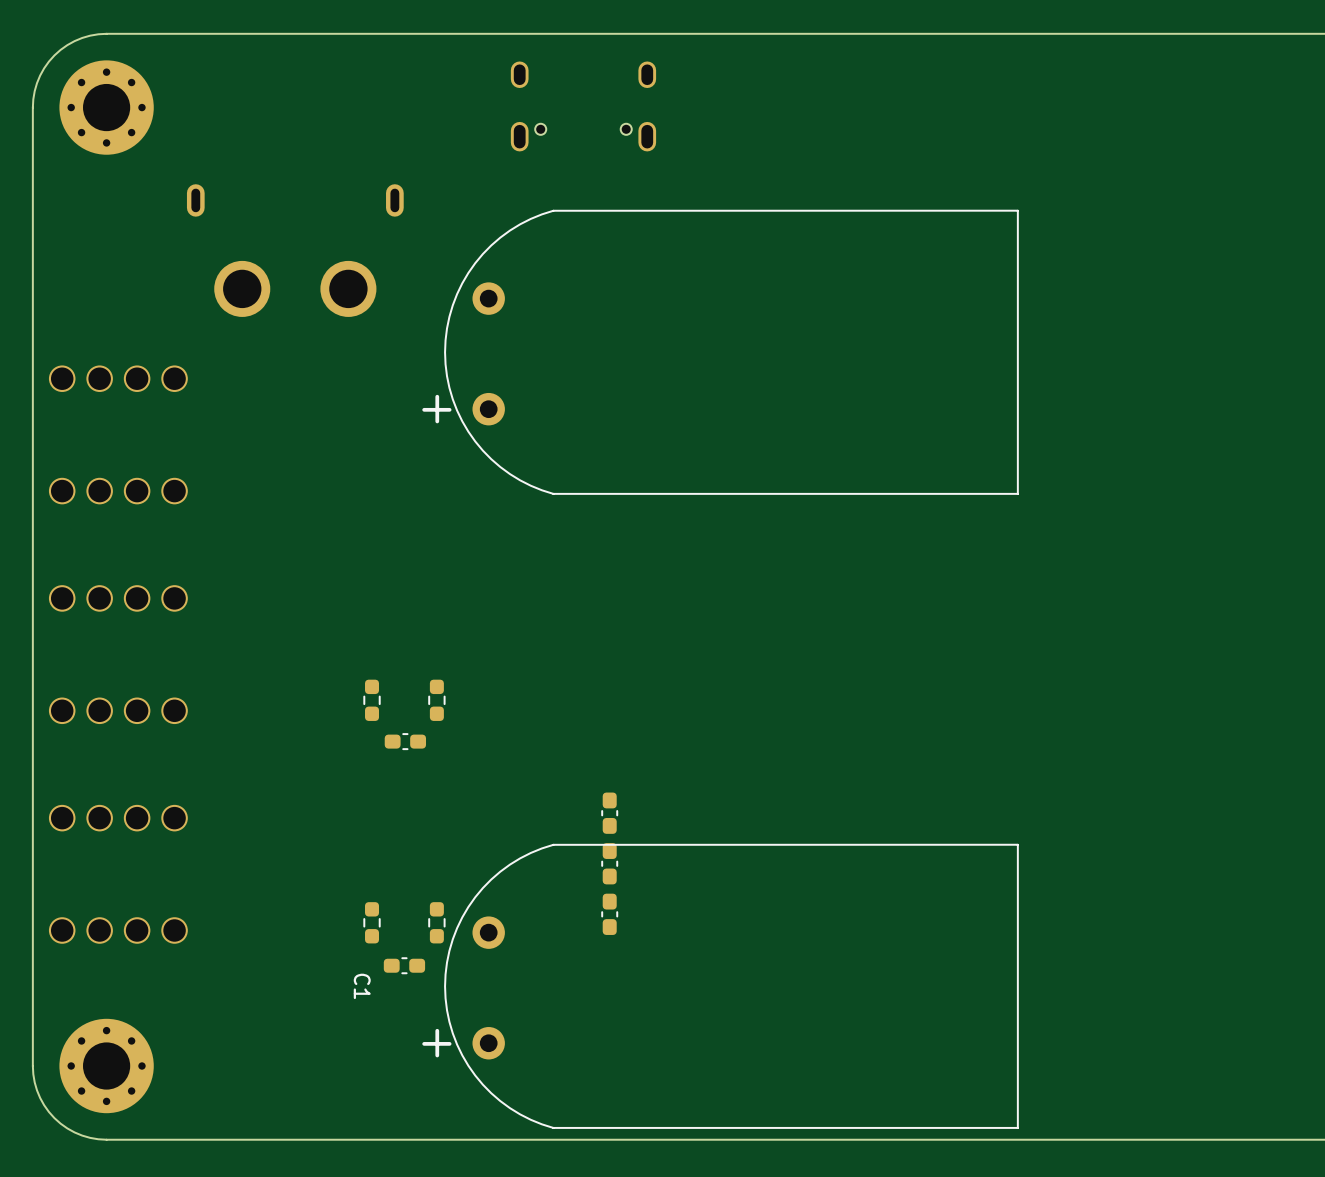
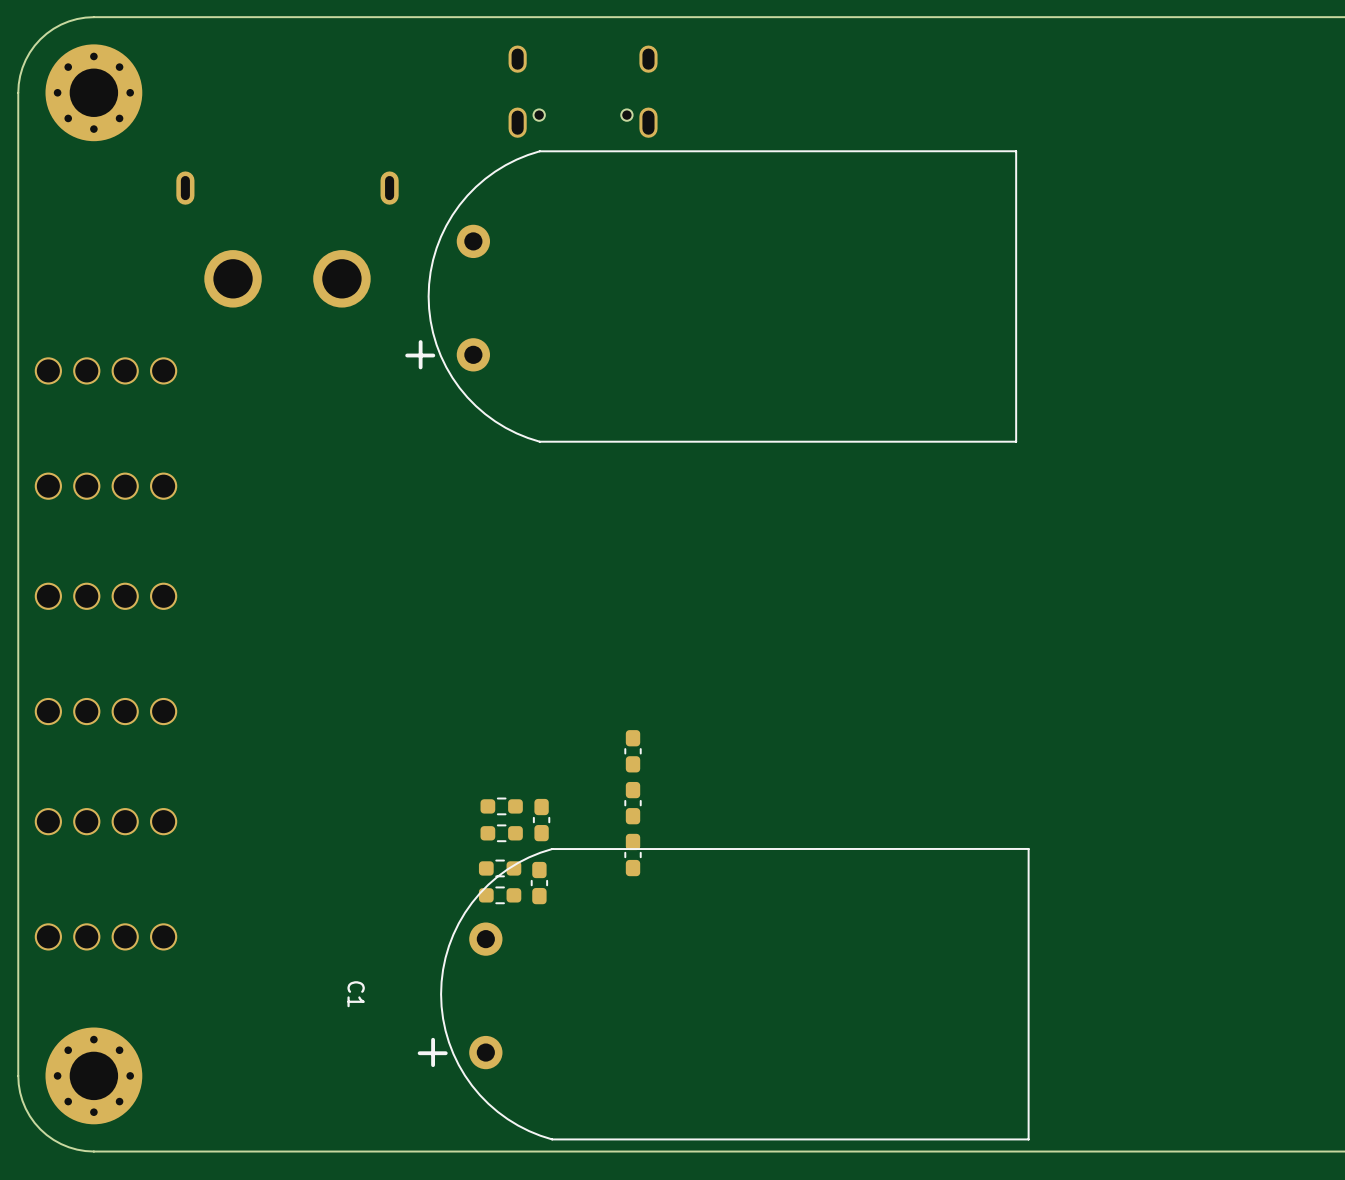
part position: (720, 352) -> (711, 296)
part: (372, 700) -> none
part: (436, 700) -> none
part: (405, 741) -> none
part: none -> (633, 751)
part: none -> (633, 803)
part: none -> (501, 806)
part: (609, 813) -> none
part: none -> (541, 820)
part: none -> (501, 833)
part: none -> (633, 855)
part: none -> (500, 868)
part: (609, 863) -> none
part: none -> (539, 883)
part: none -> (500, 895)
part: (609, 914) -> none
part: (372, 922) -> none
part: (436, 922) -> none
part: (404, 965) -> none

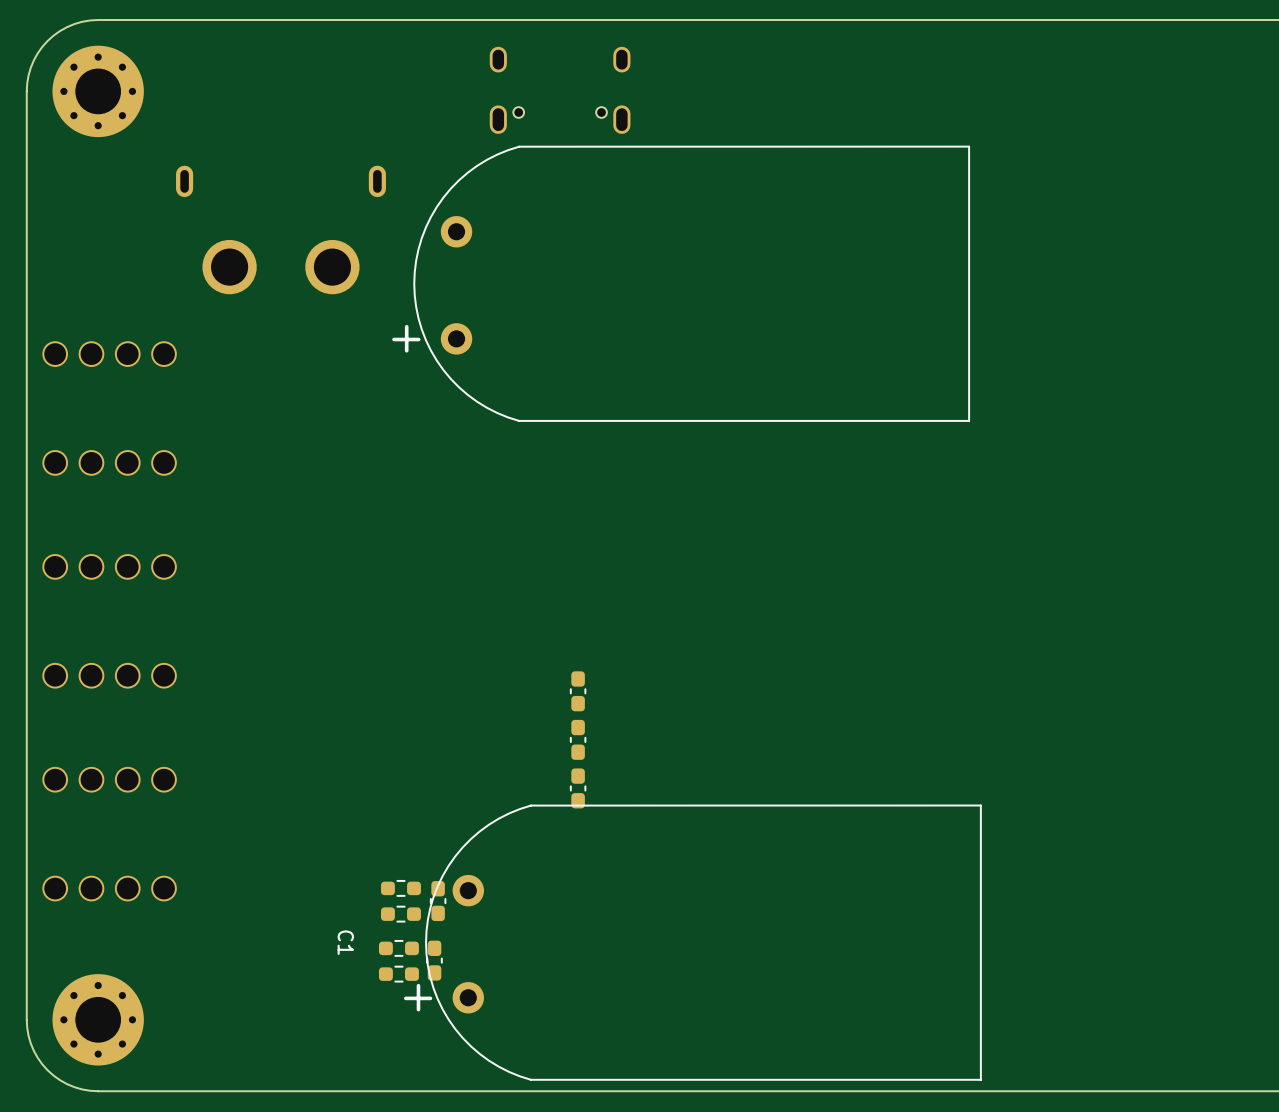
part: none -> (578, 691)
part: (633, 751) -> none
part: none -> (578, 739)
part: (633, 803) -> none
part: (501, 806) -> none
part: (541, 820) -> none
part: none -> (578, 788)
part: (501, 833) -> none
part: (633, 855) -> none
part: (500, 868) -> none
part: (539, 883) -> none
part: (500, 895) -> none
part: none -> (400, 888)
part: none -> (438, 901)
part: none -> (400, 914)
part: none -> (398, 948)
part: none -> (434, 960)
part: none -> (398, 974)

